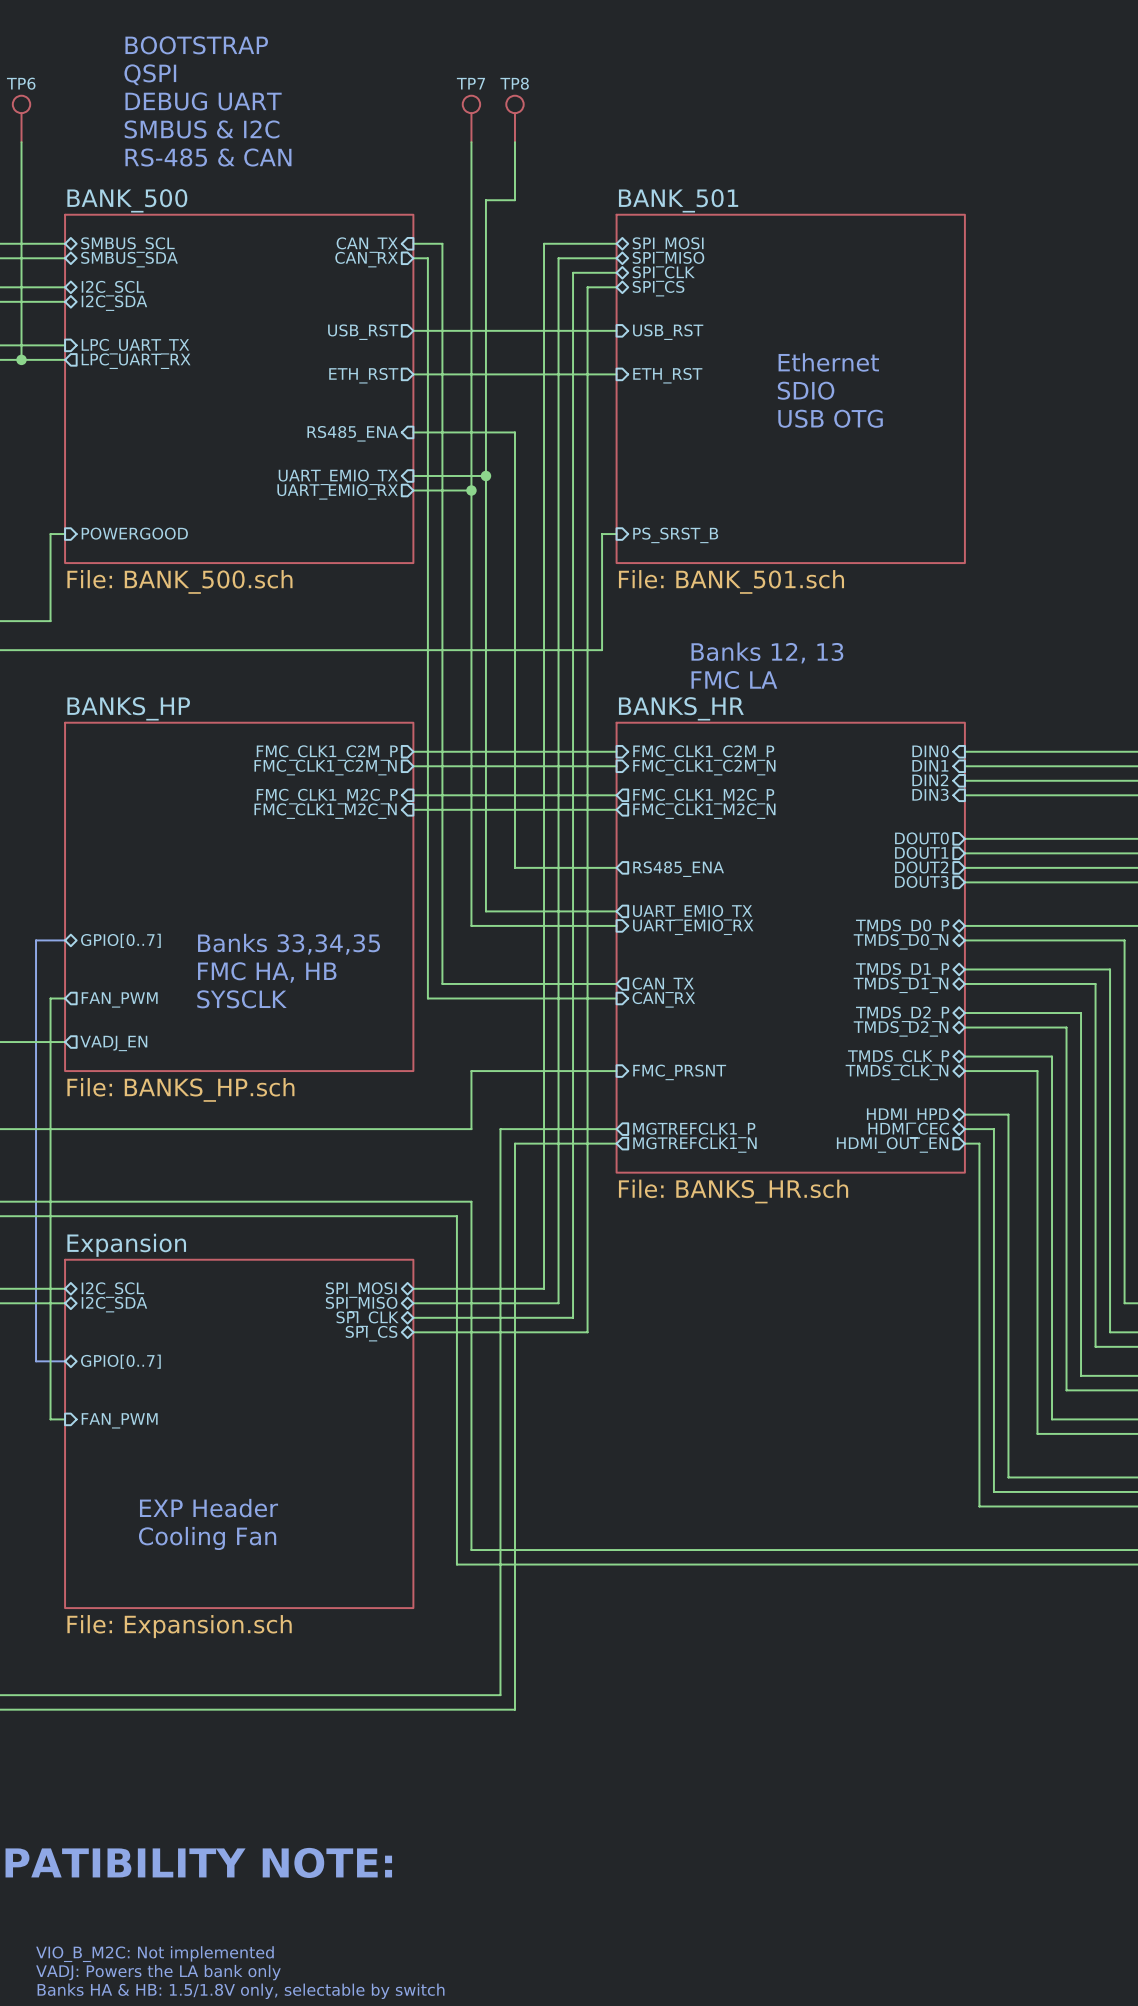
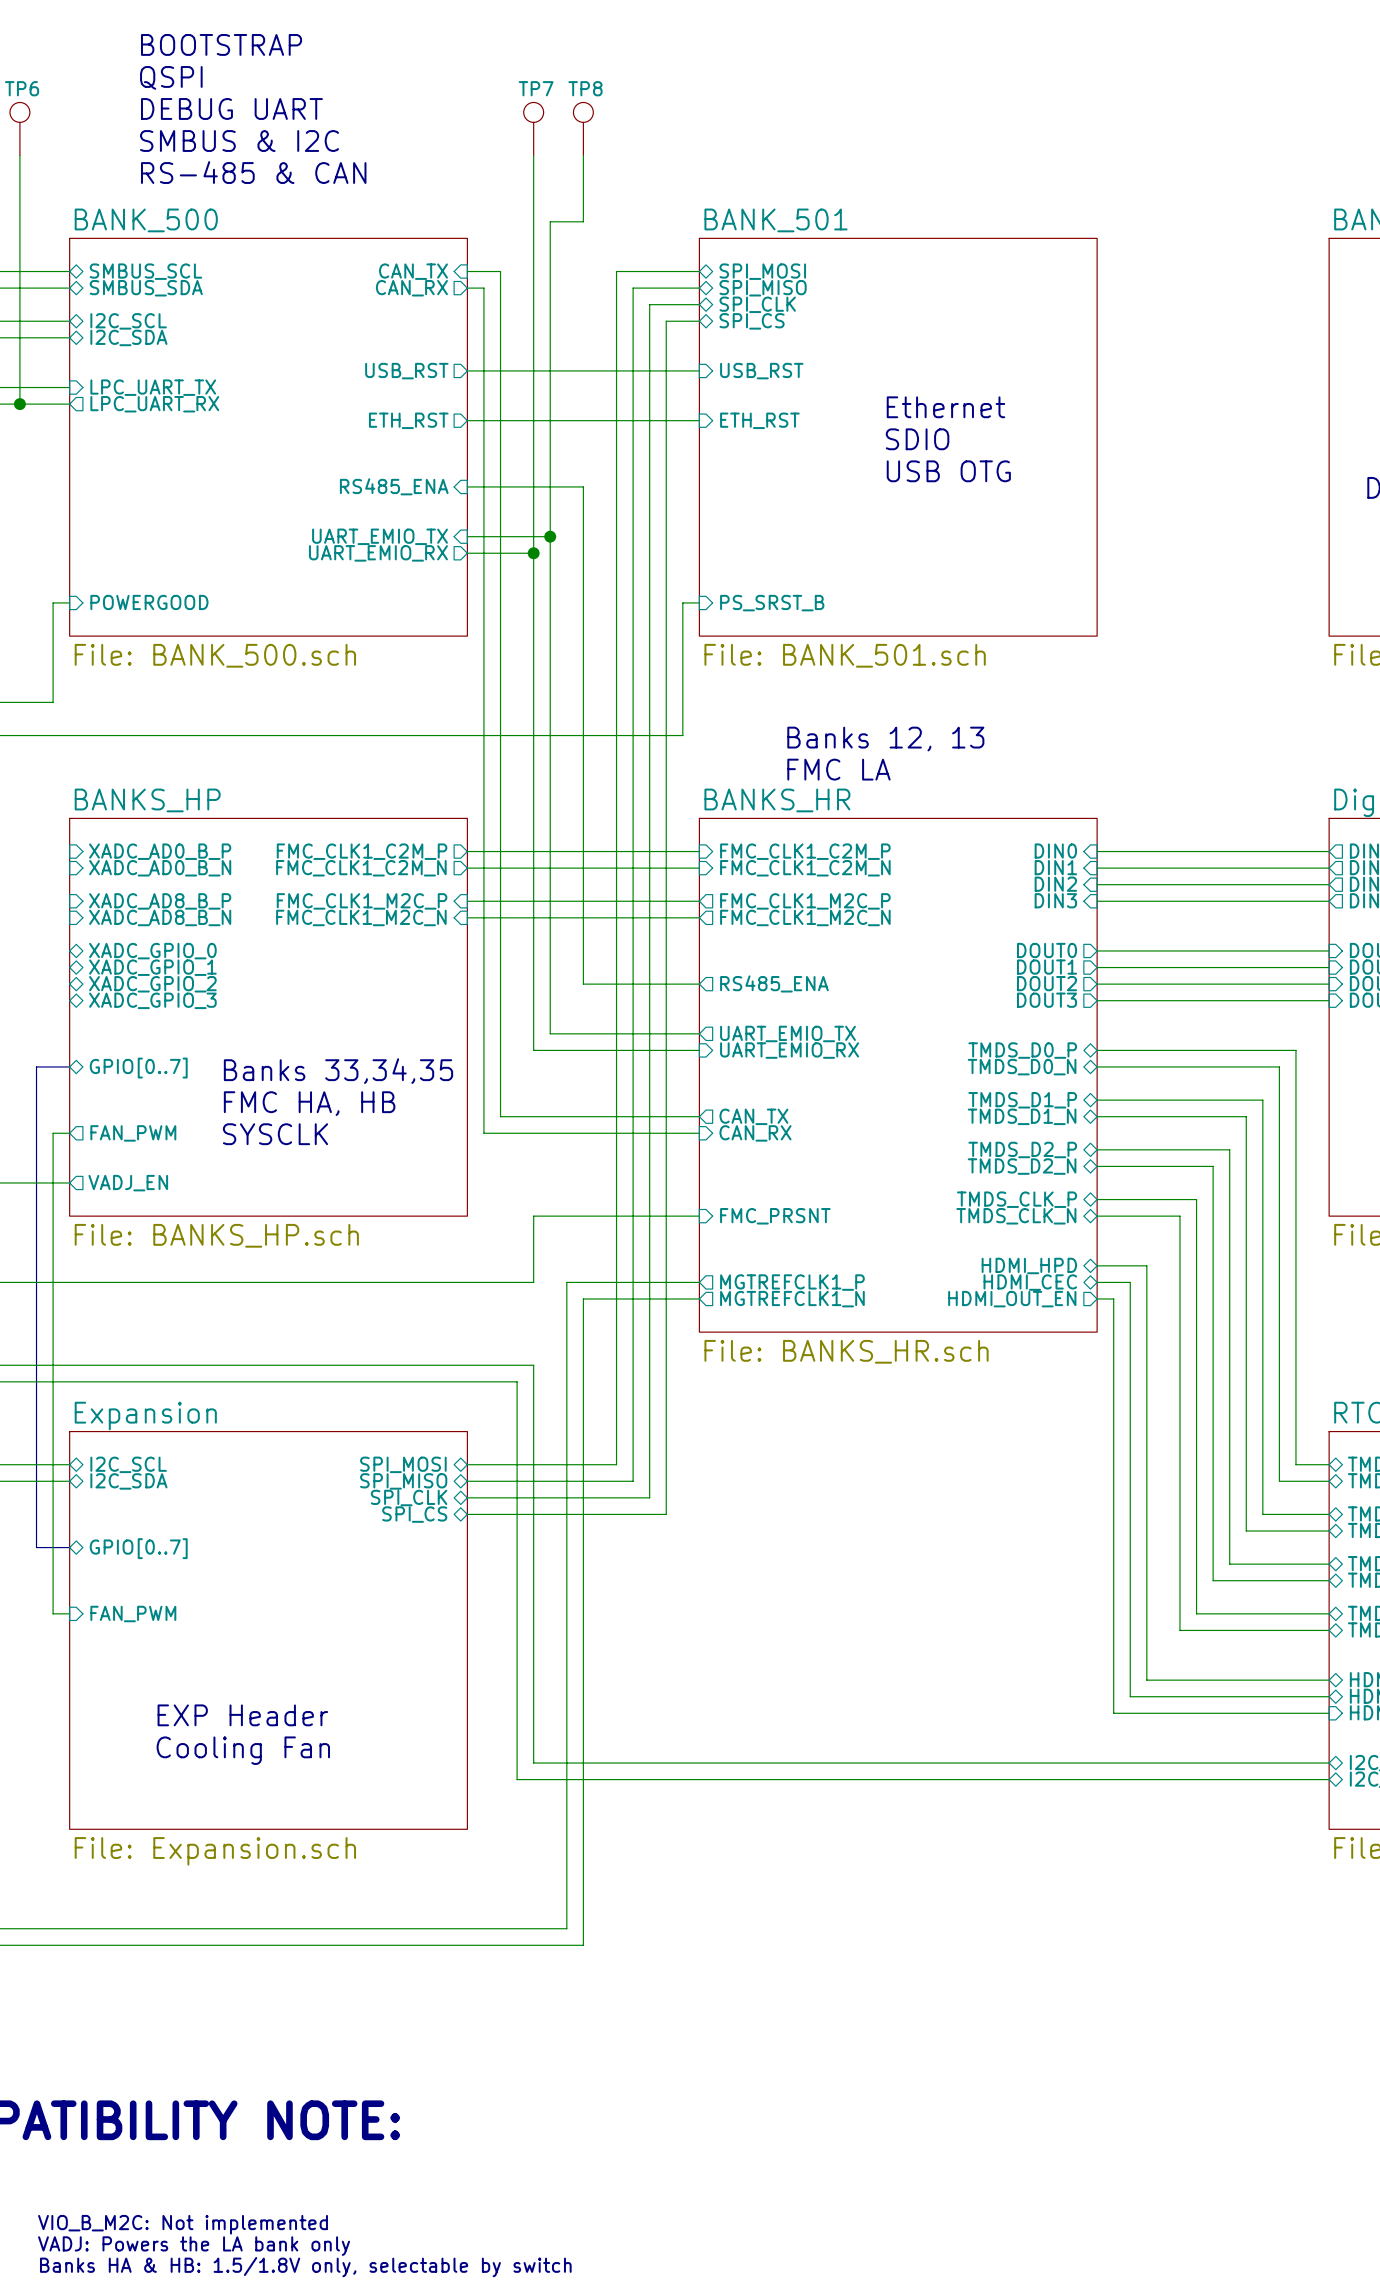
sheet pin: none -> XADC_AD0_B_P (160, 851)
sheet pin: none -> XADC_AD0_B_N (160, 868)
sheet pin: none -> XADC_AD8_B_P (160, 901)
sheet pin: none -> XADC_AD8_B_N (160, 917)
sheet pin: none -> XADC_GPIO_0 (152, 951)
sheet pin: none -> XADC_GPIO_1 (152, 967)
sheet pin: none -> XADC_GPIO_2 (152, 984)
sheet pin: none -> XADC_GPIO_3 (152, 1000)

